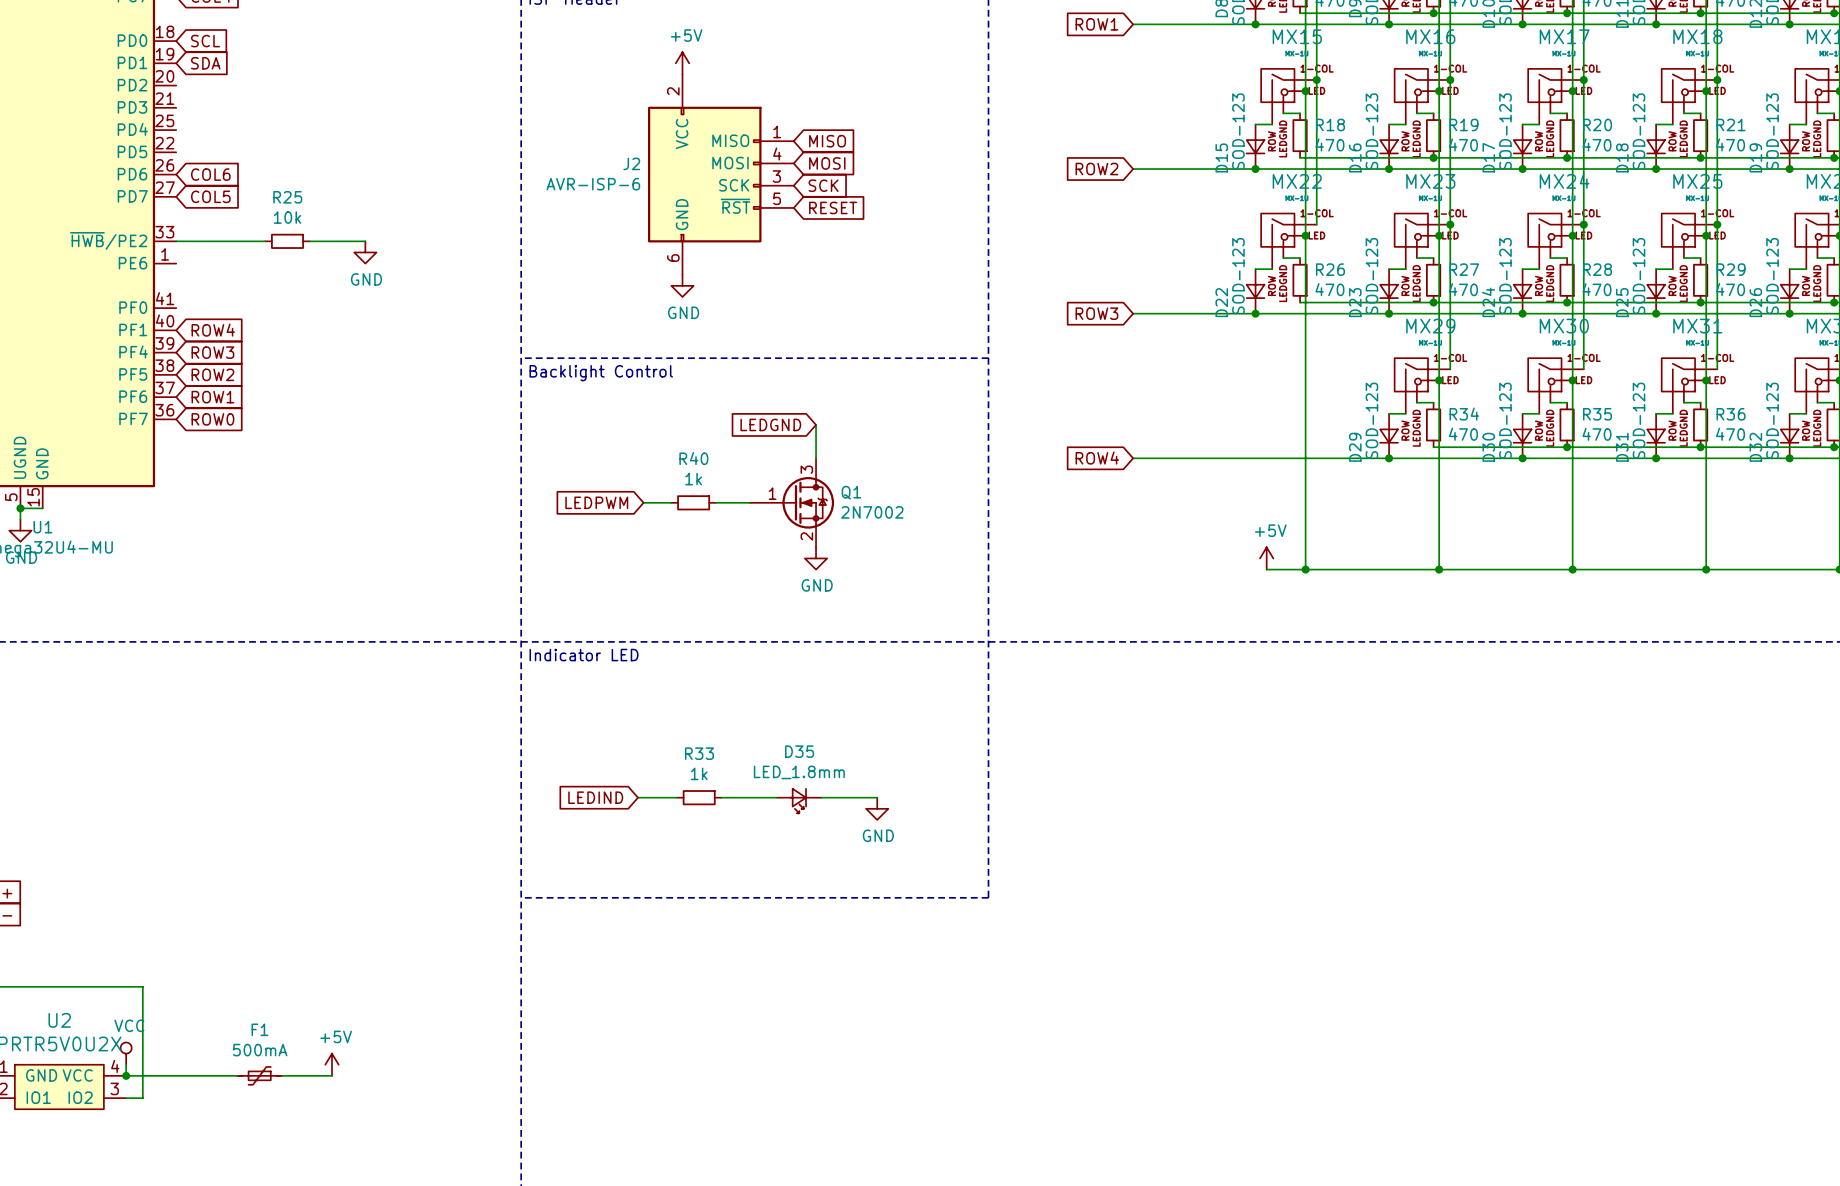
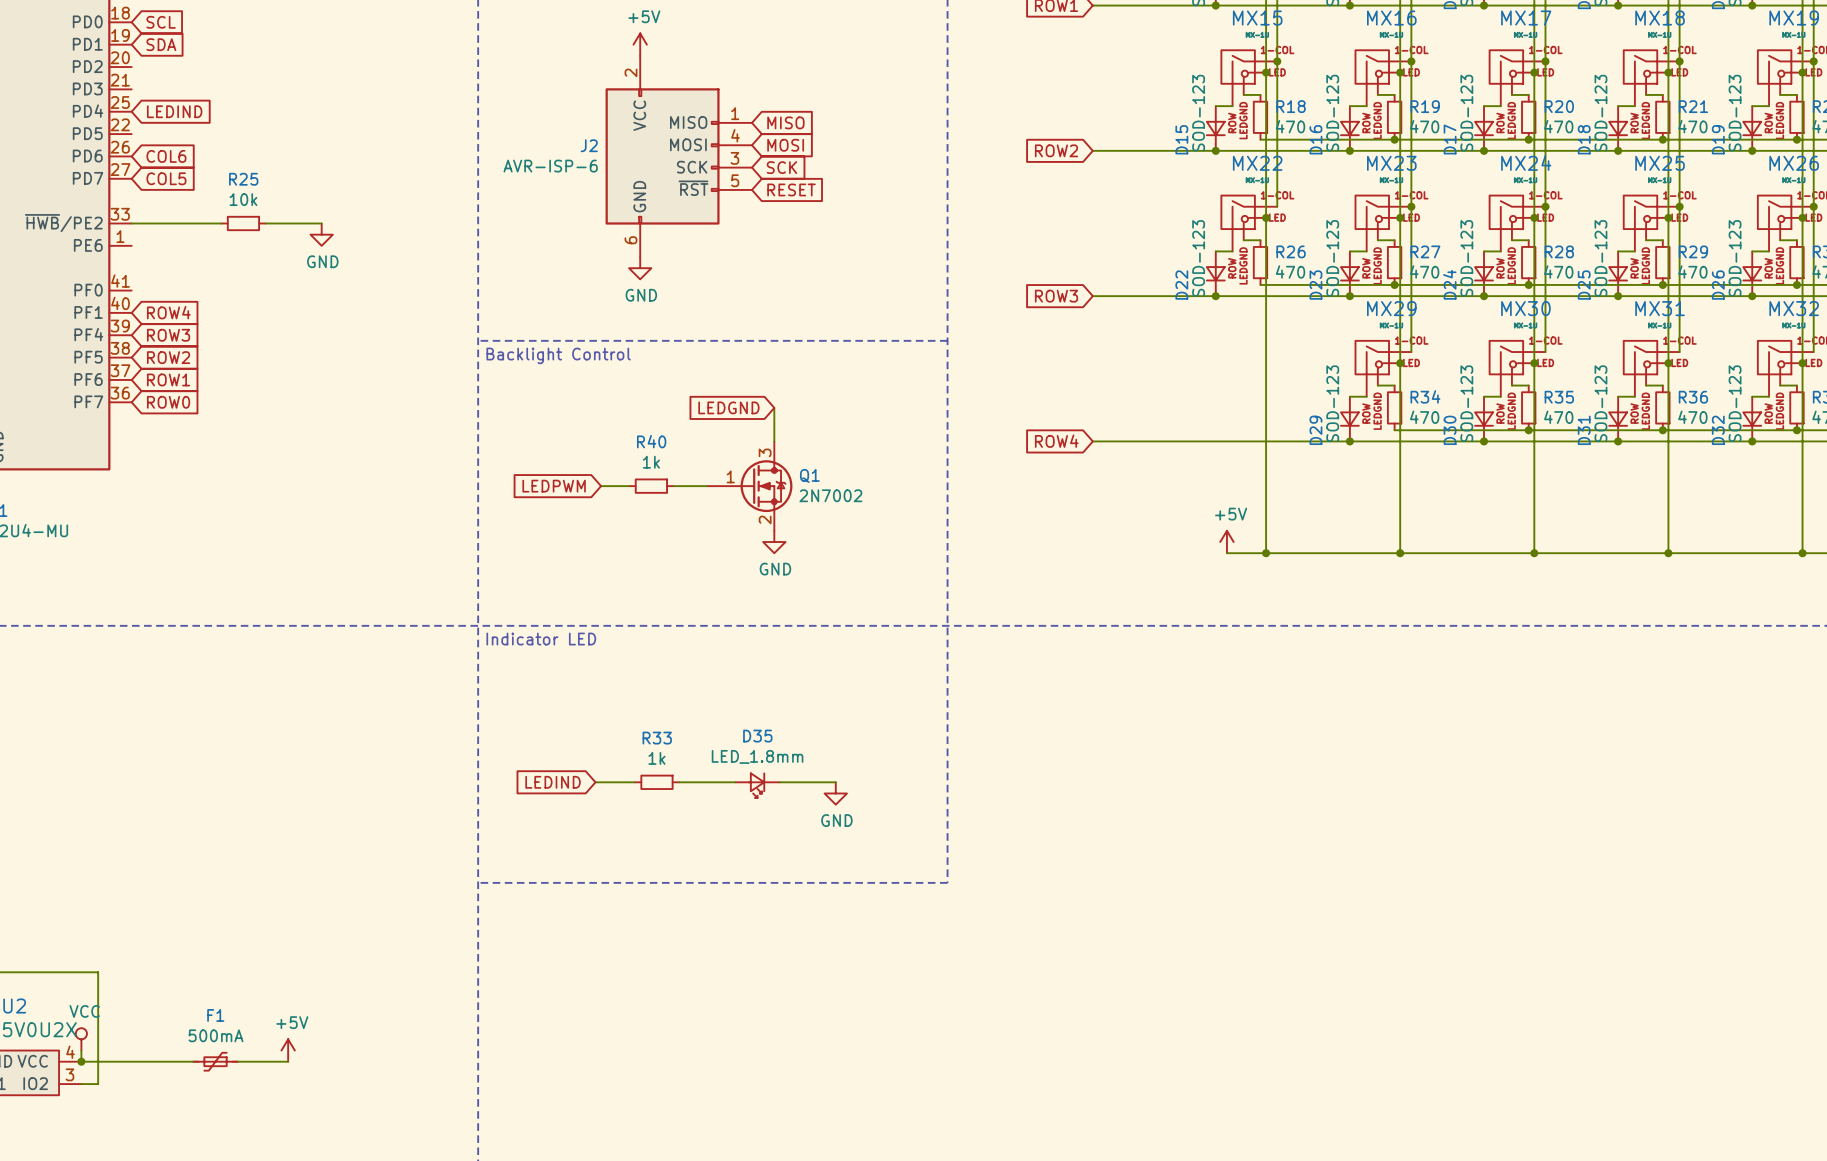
global label: none -> LEDIND (174, 111)

